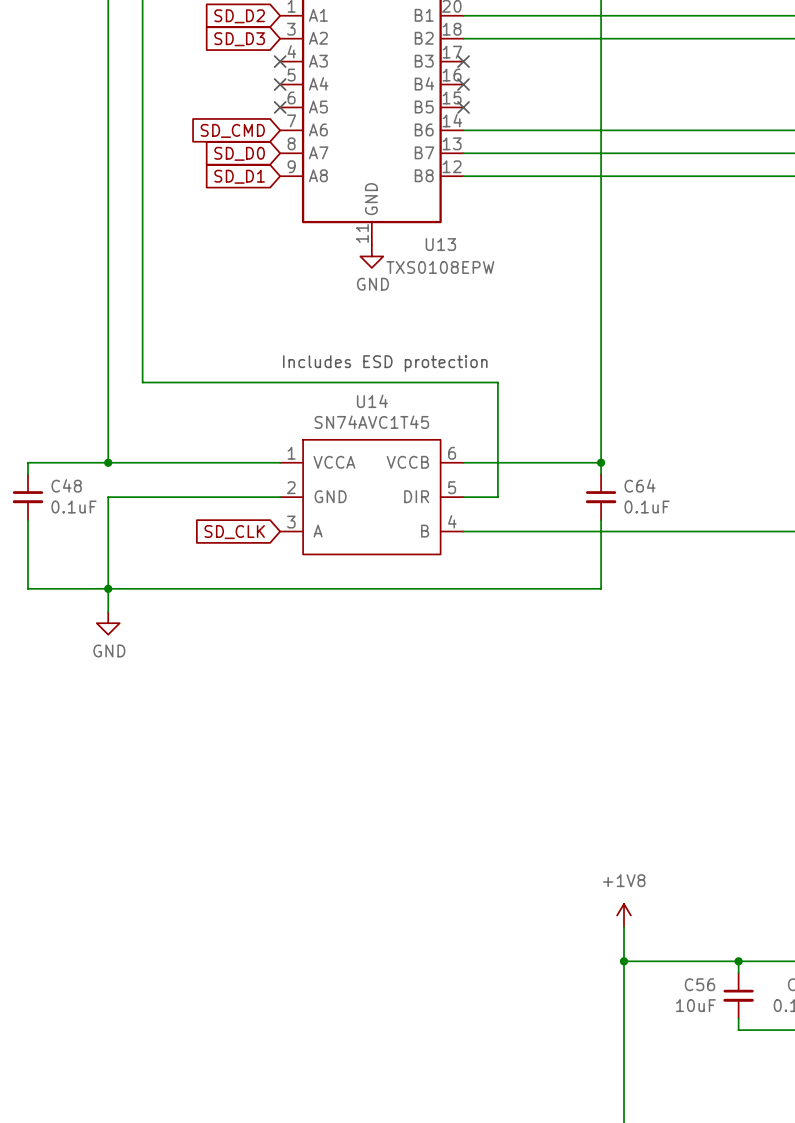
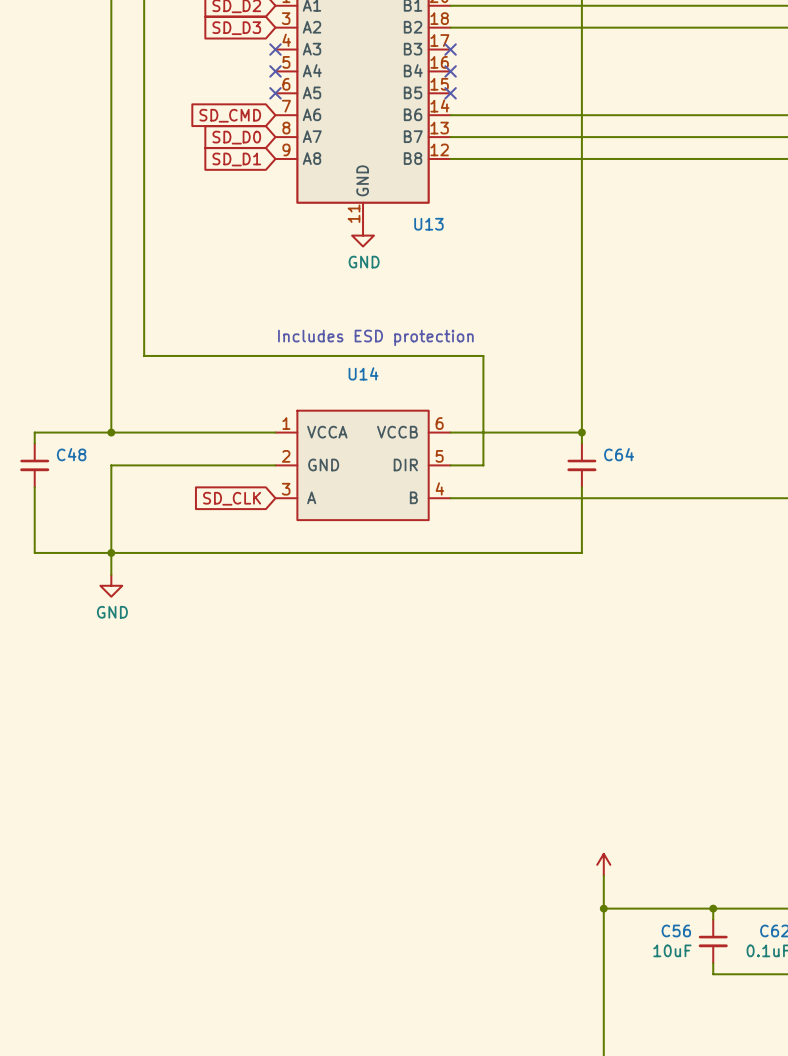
U13 value: TXS0108EPW (440, 267) -> none
U14 value: SN74AVC1T45 (371, 422) -> none
C48 value: 0.1uF (74, 507) -> none
C64 value: 0.1uF (647, 507) -> none
power symbol text: +1V8 (624, 880) -> none

